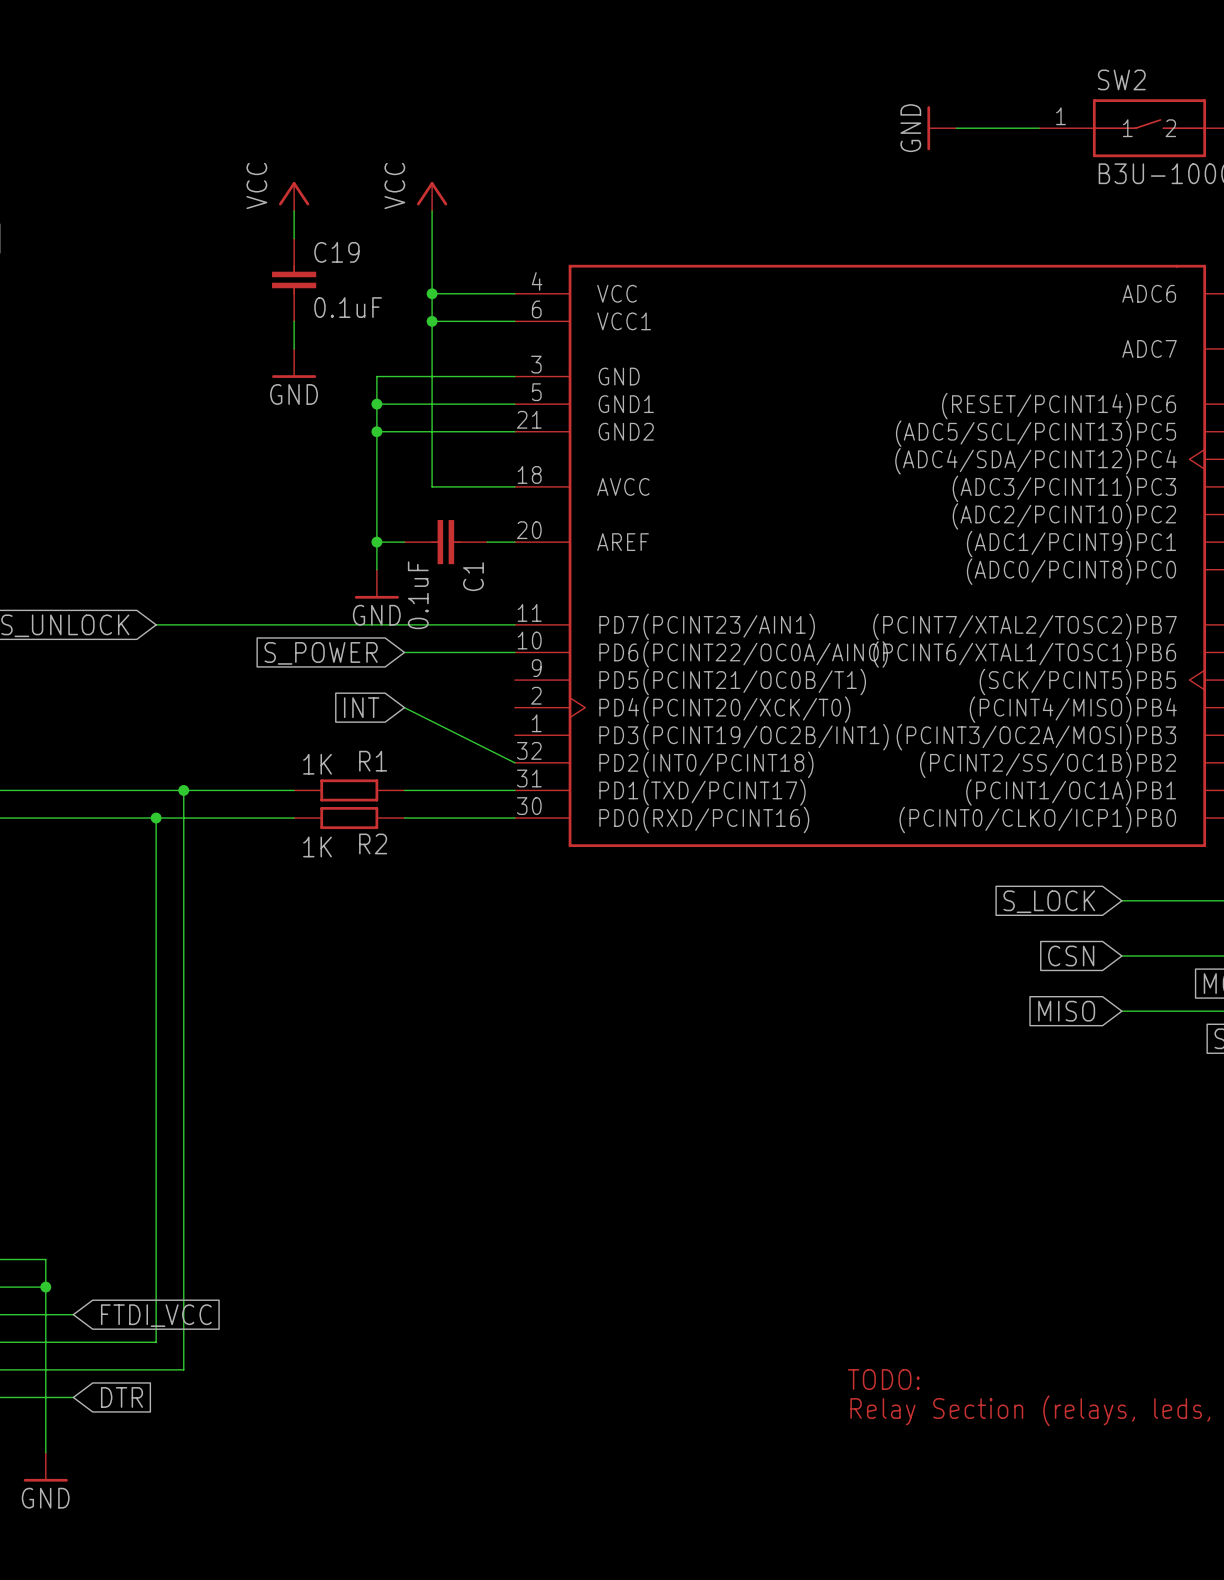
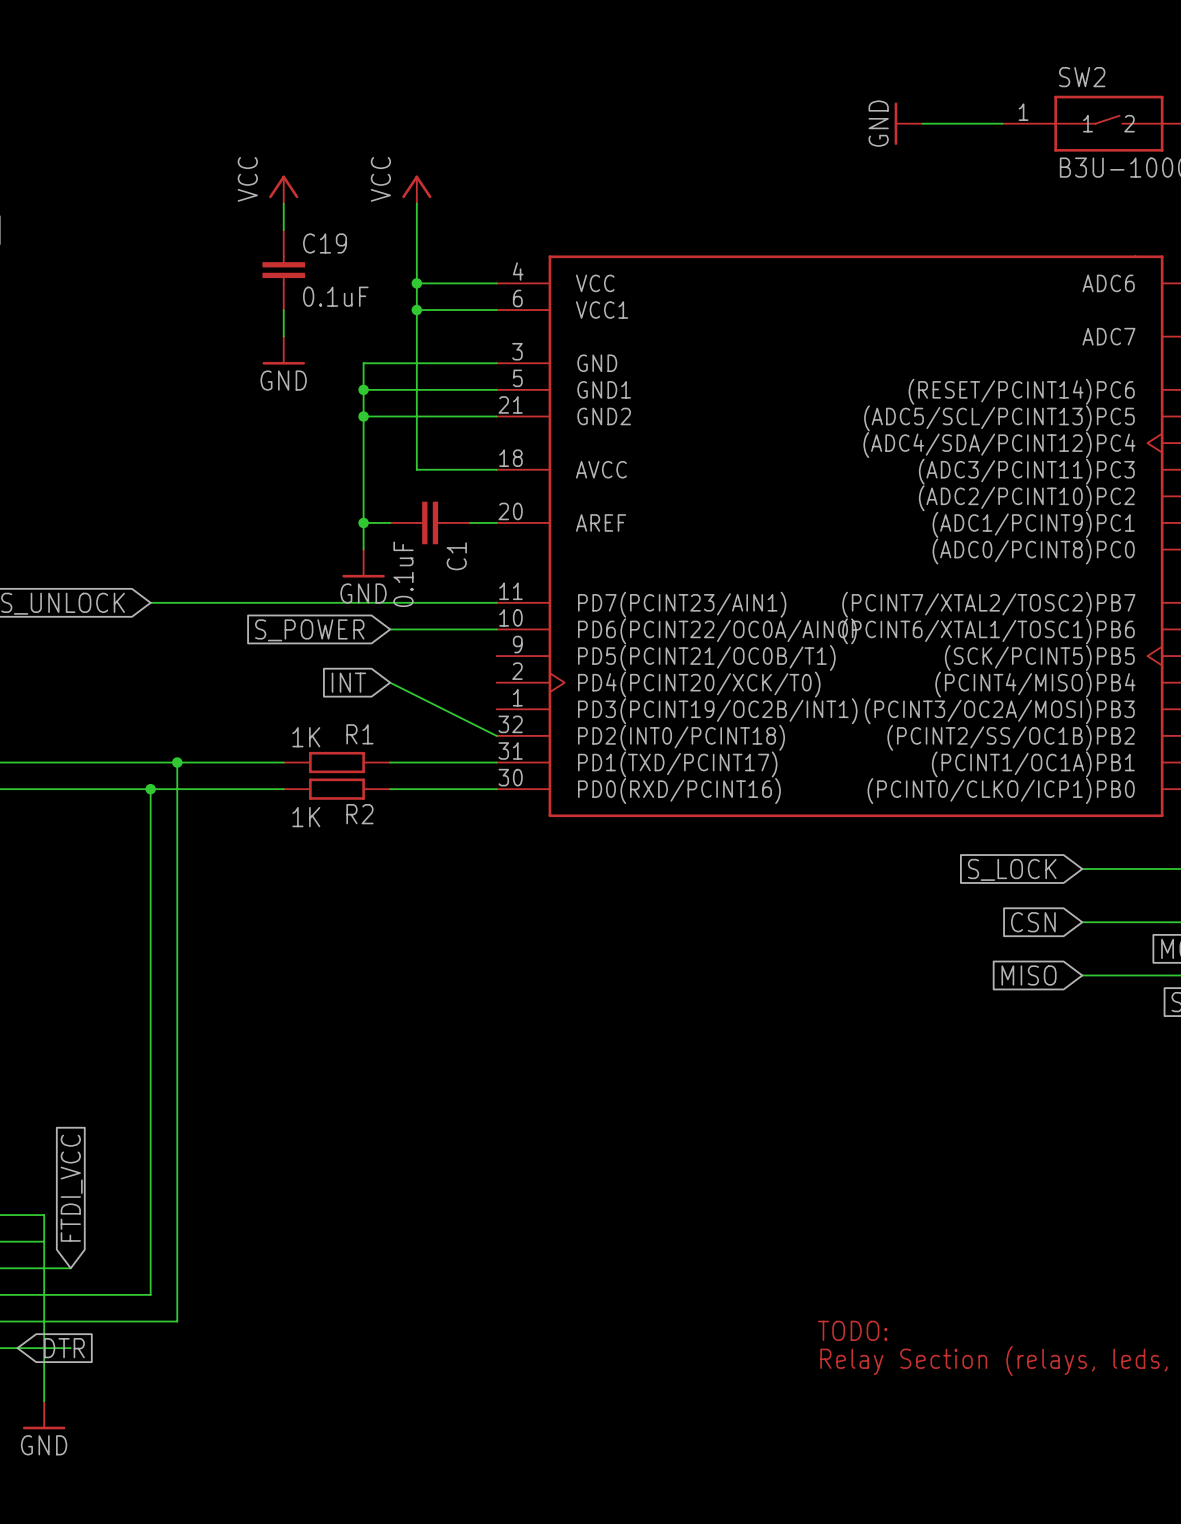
junction: (45, 1287) -> none
global label rotation: 0° (156, 1315) -> 90° counterclockwise (71, 1188)
global label position: DTR (121, 1397) -> DTR (64, 1348)

